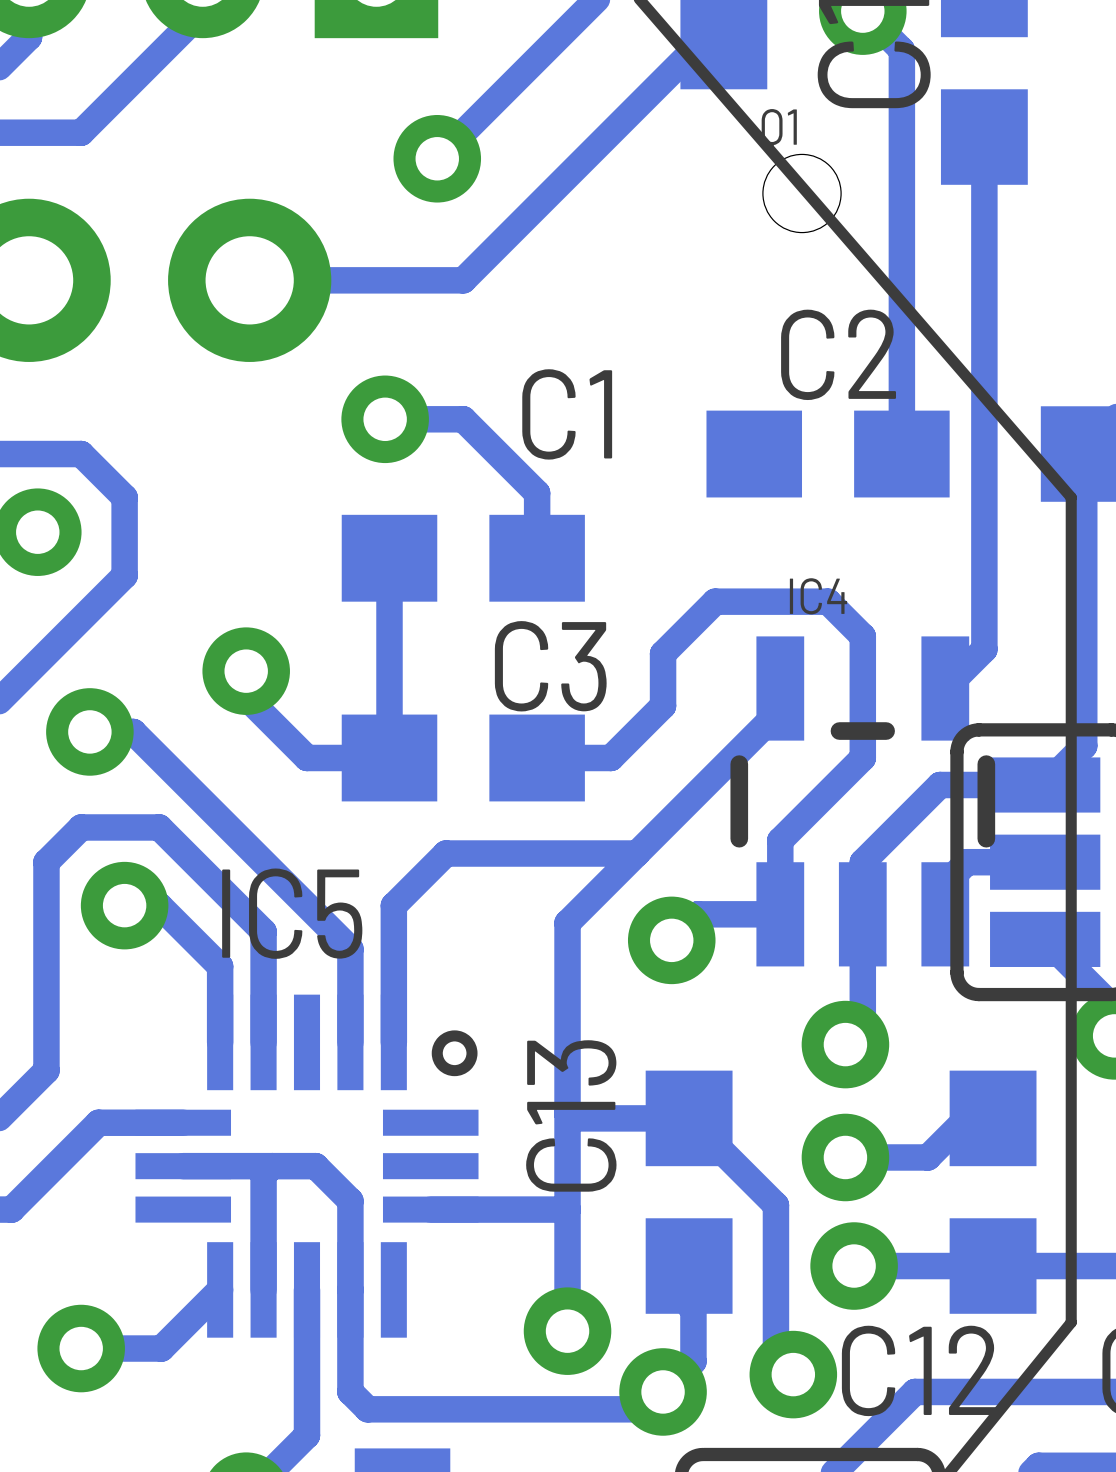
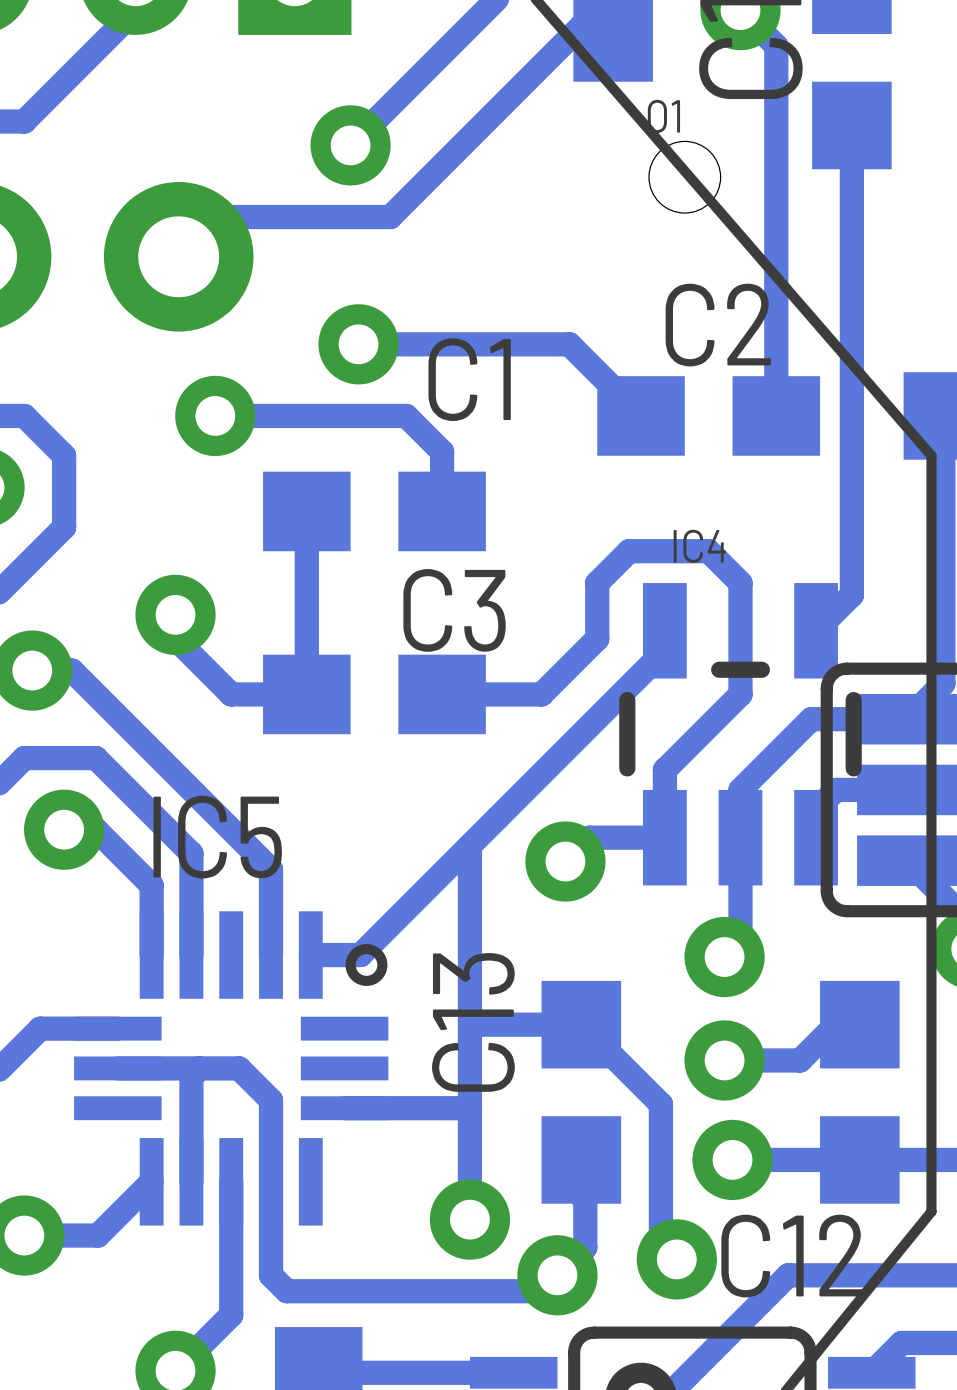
track: (715, 28) (463, 280) (249, 280) -> (605, 26) (581, 26) (390, 217) (218, 217) (178, 256)
track: none -> (358, 344) (569, 344) (641, 415)
track: (385, 419) (463, 419) (498, 454) -> (215, 415) (406, 415)
via position: (385, 419) -> (358, 344)
via: none -> (215, 415)
track: (741, 601) (715, 601) (663, 653) (663, 705) (610, 757) -> (629, 551) (597, 583) (597, 638) (541, 694) (509, 694)
track: (637, 853) (445, 853) (393, 905) (393, 1042) -> (469, 845) (360, 955) (310, 955)

